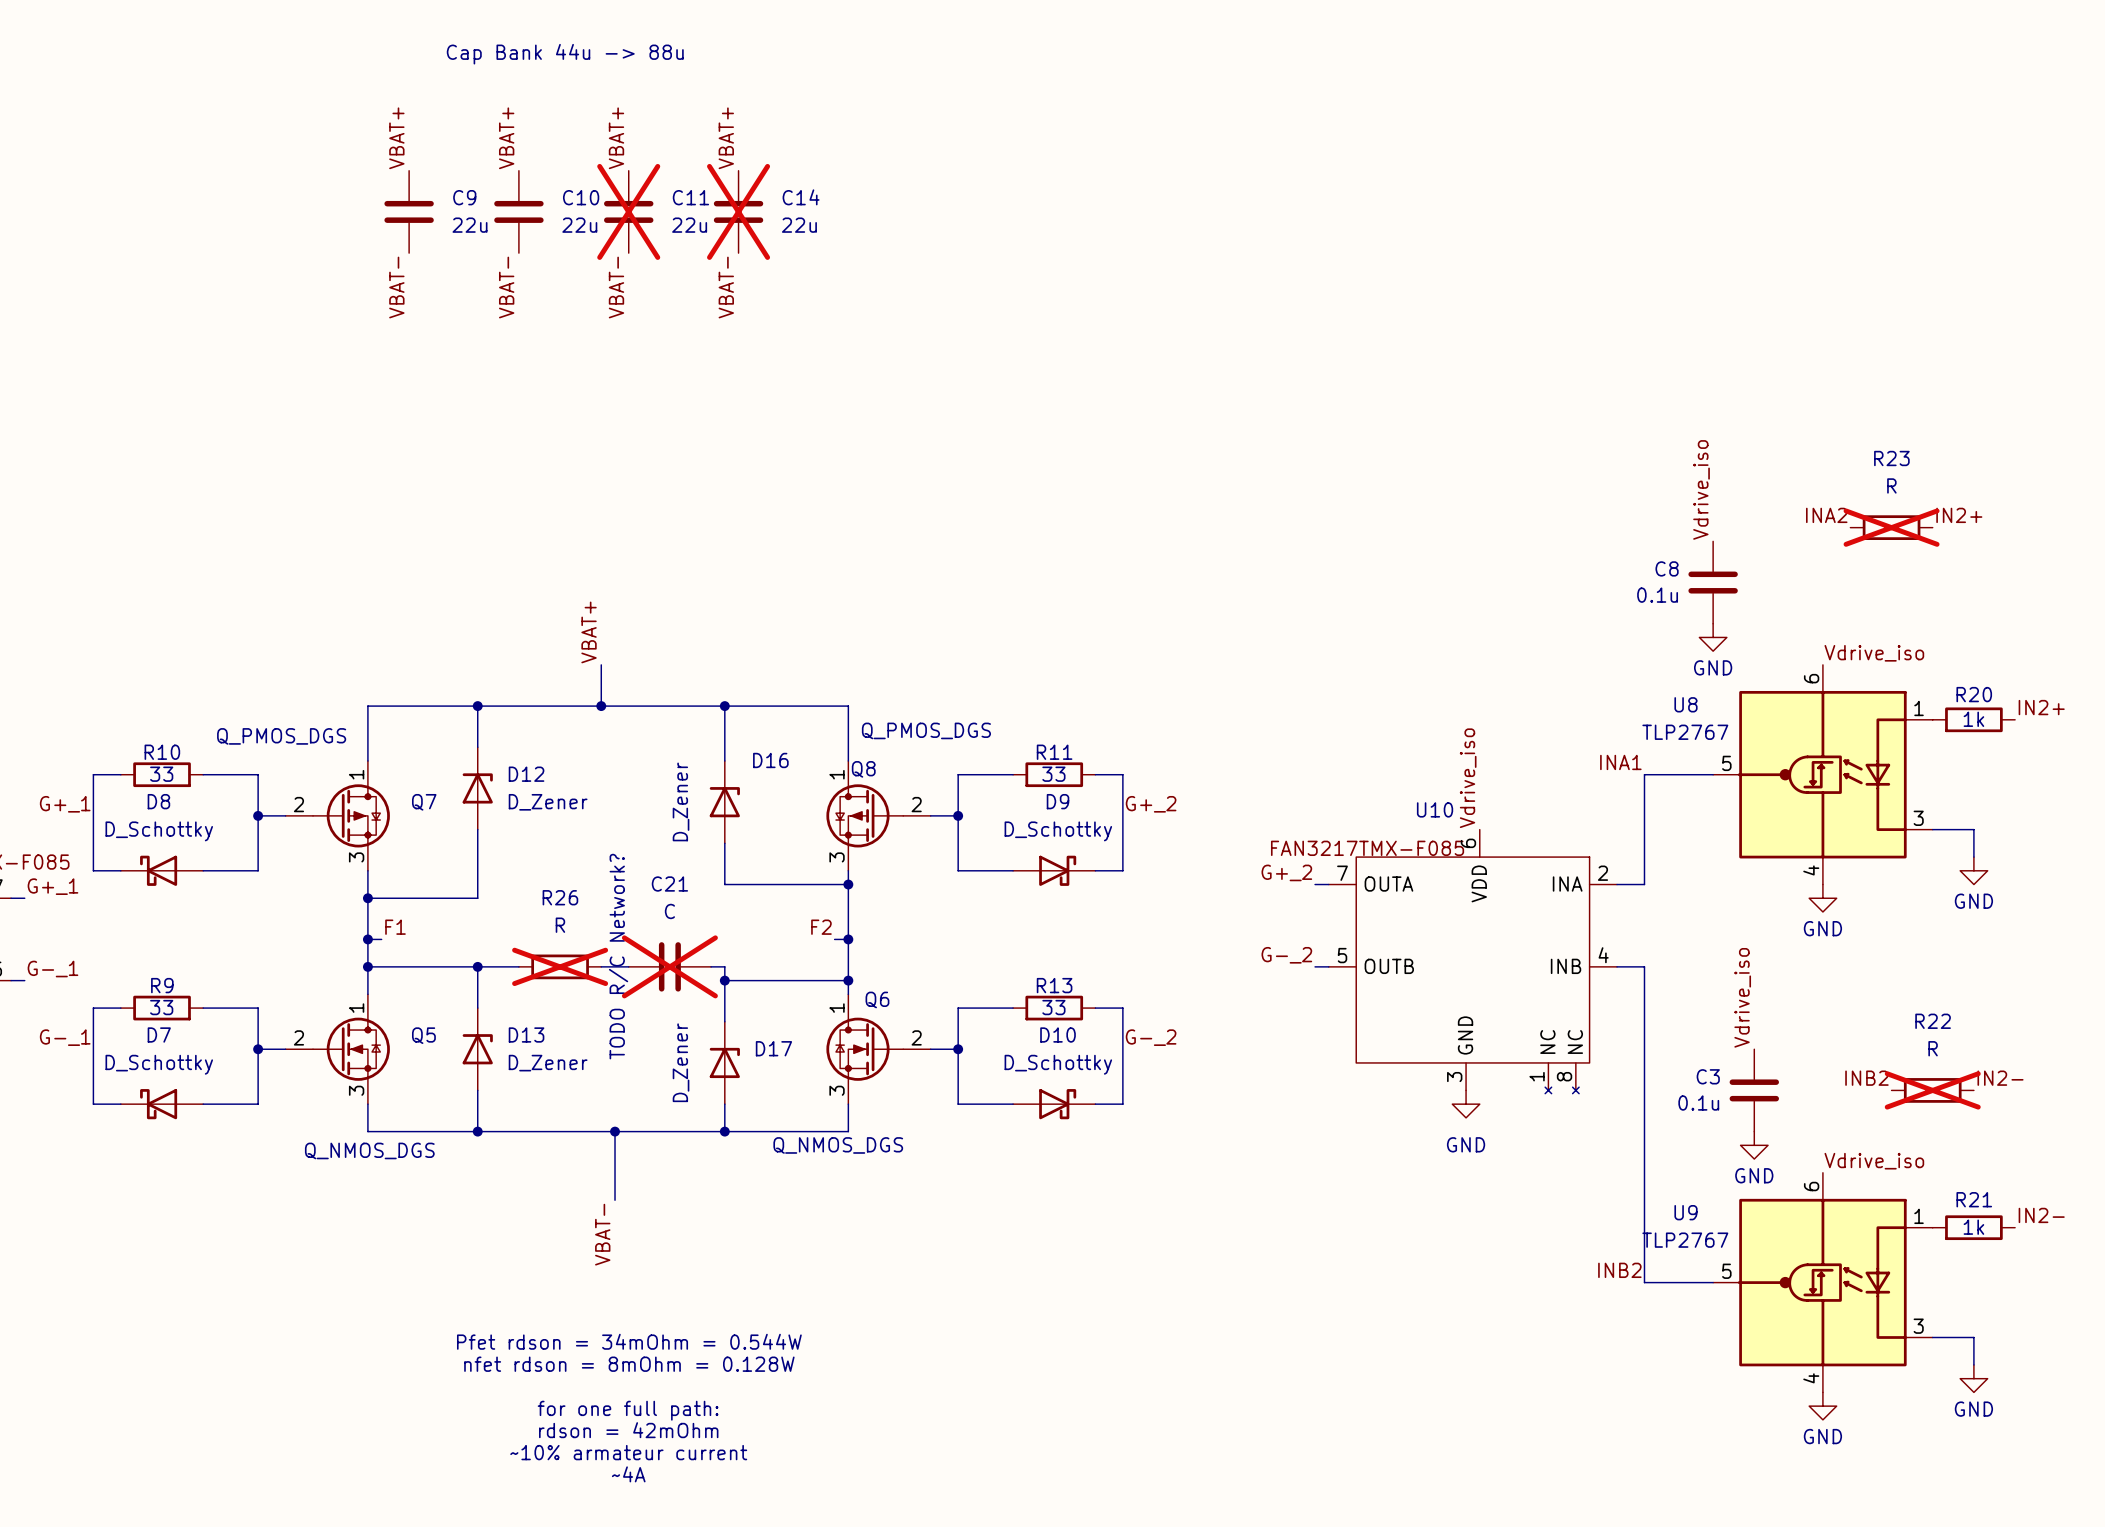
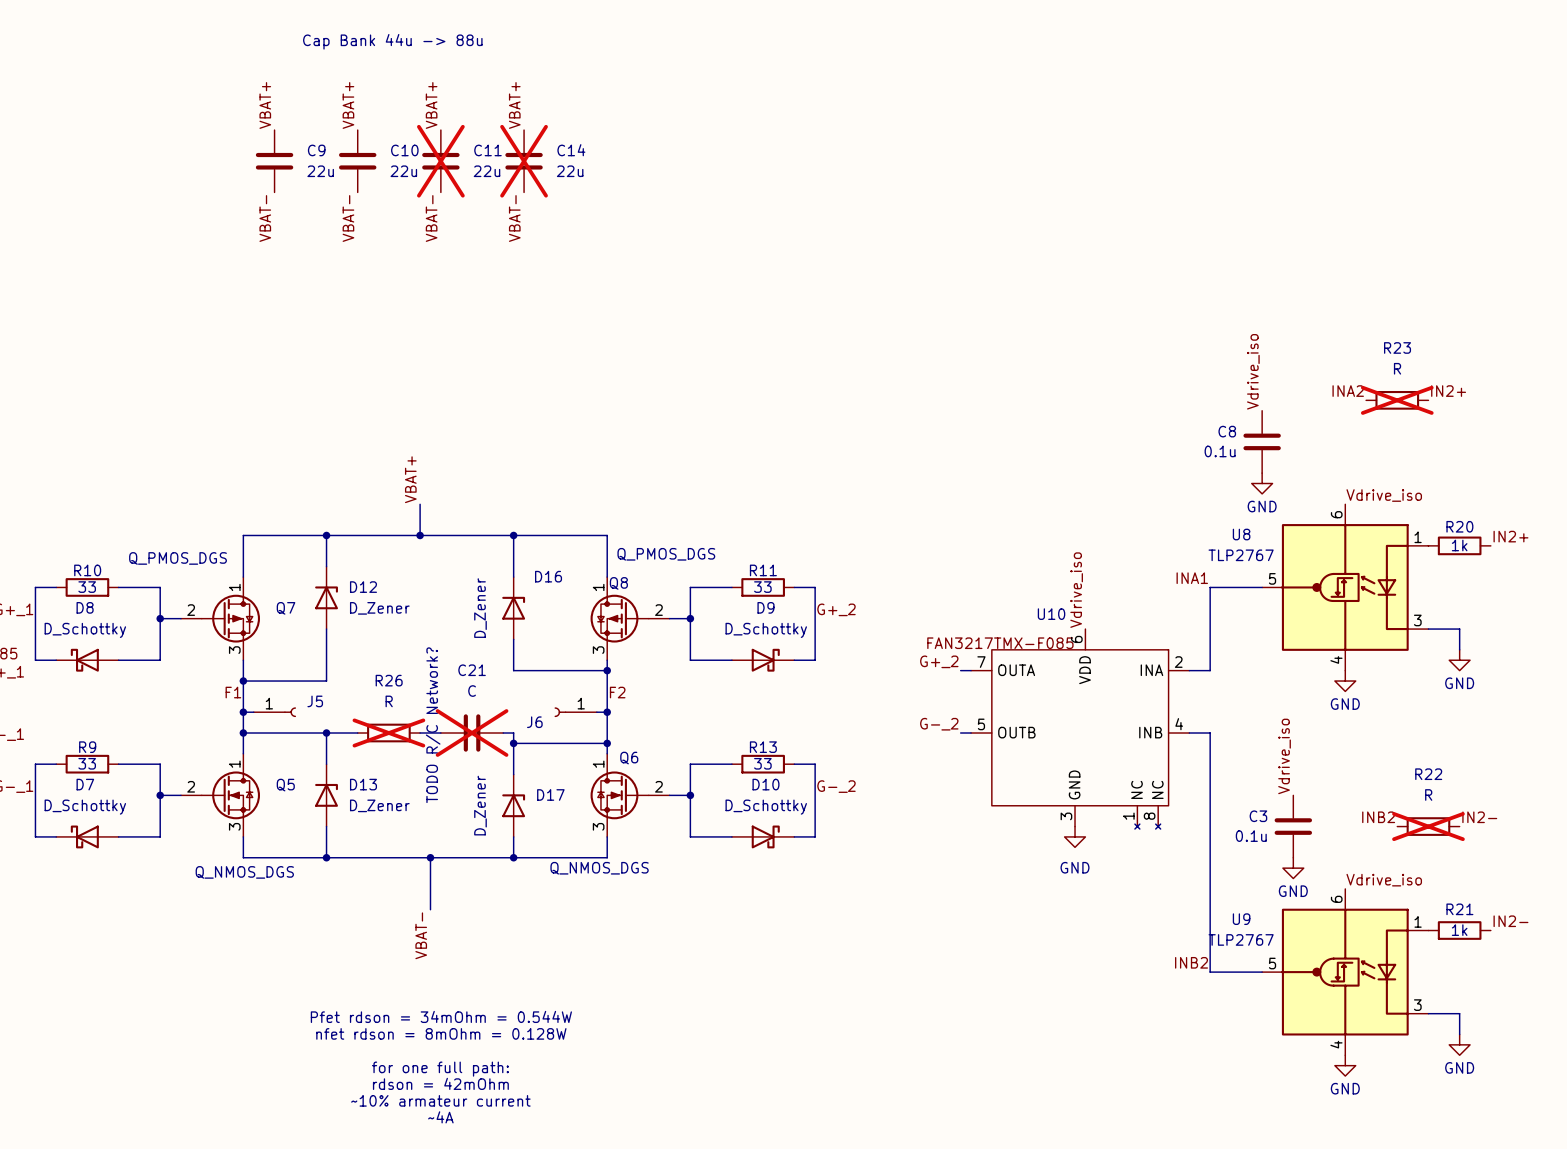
label position: F1 (395, 927) -> F1 (233, 692)
label position: F2 (821, 927) -> F2 (617, 692)
J5: none -> (274, 712)
J6: none -> (575, 712)

